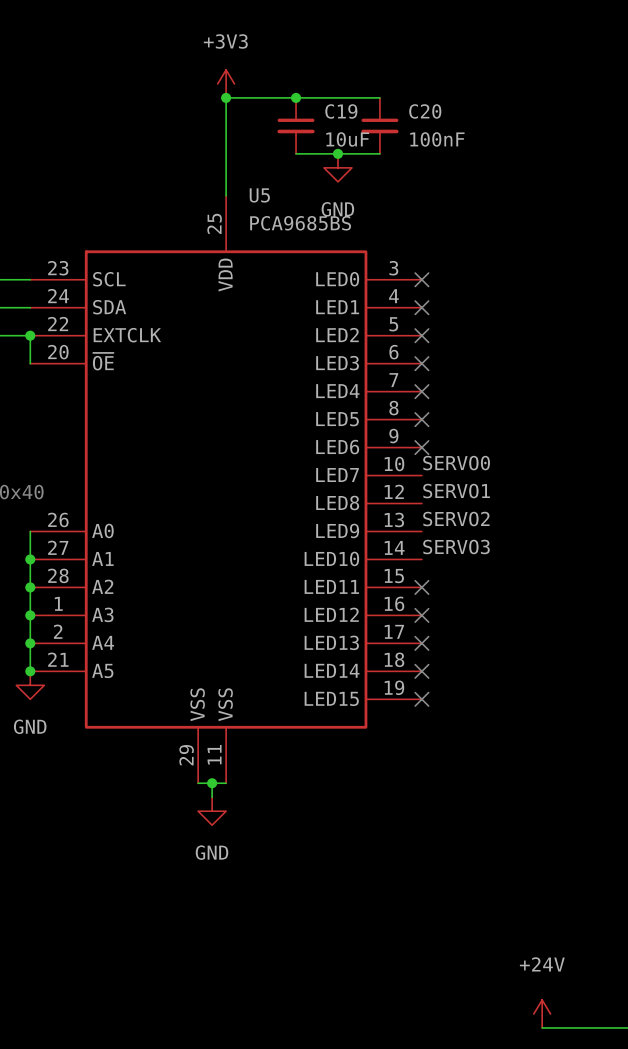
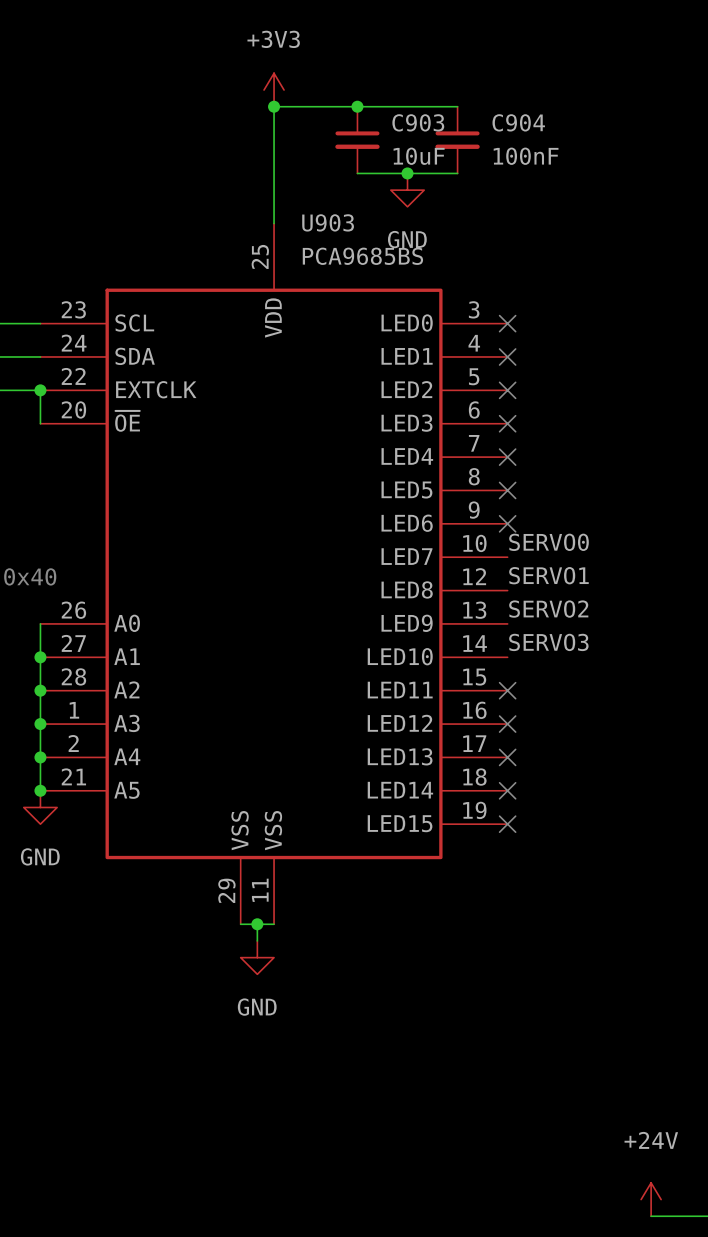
C19 name: C19 (341, 111) -> C903 (418, 122)
C20 name: C20 (425, 111) -> C904 (518, 122)
U5 name: U5 (259, 195) -> U903 (328, 222)

